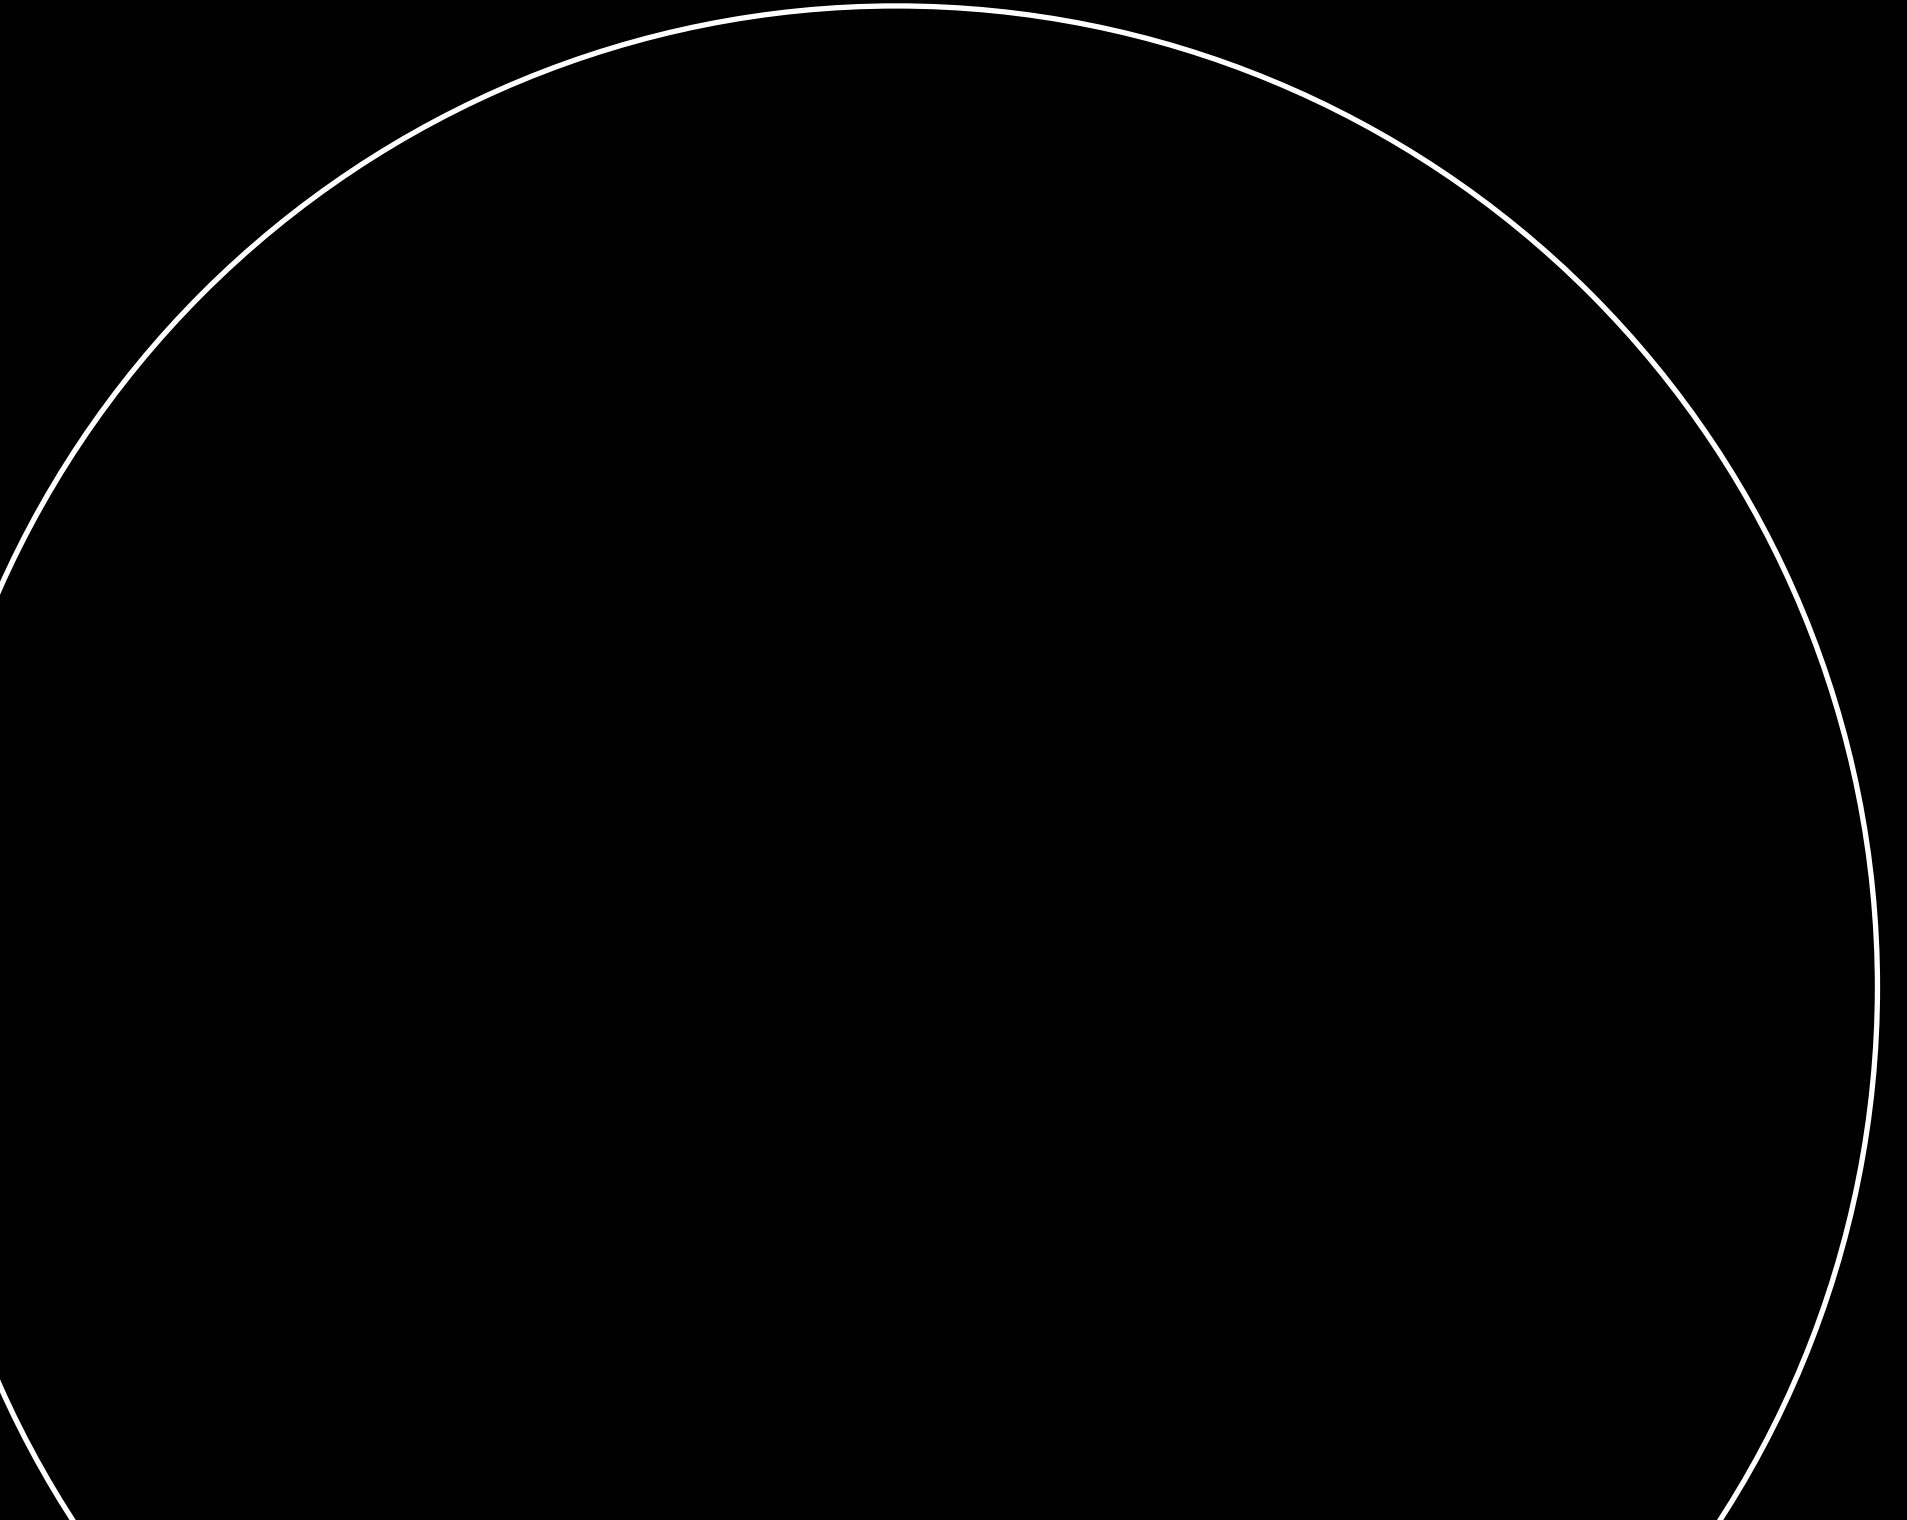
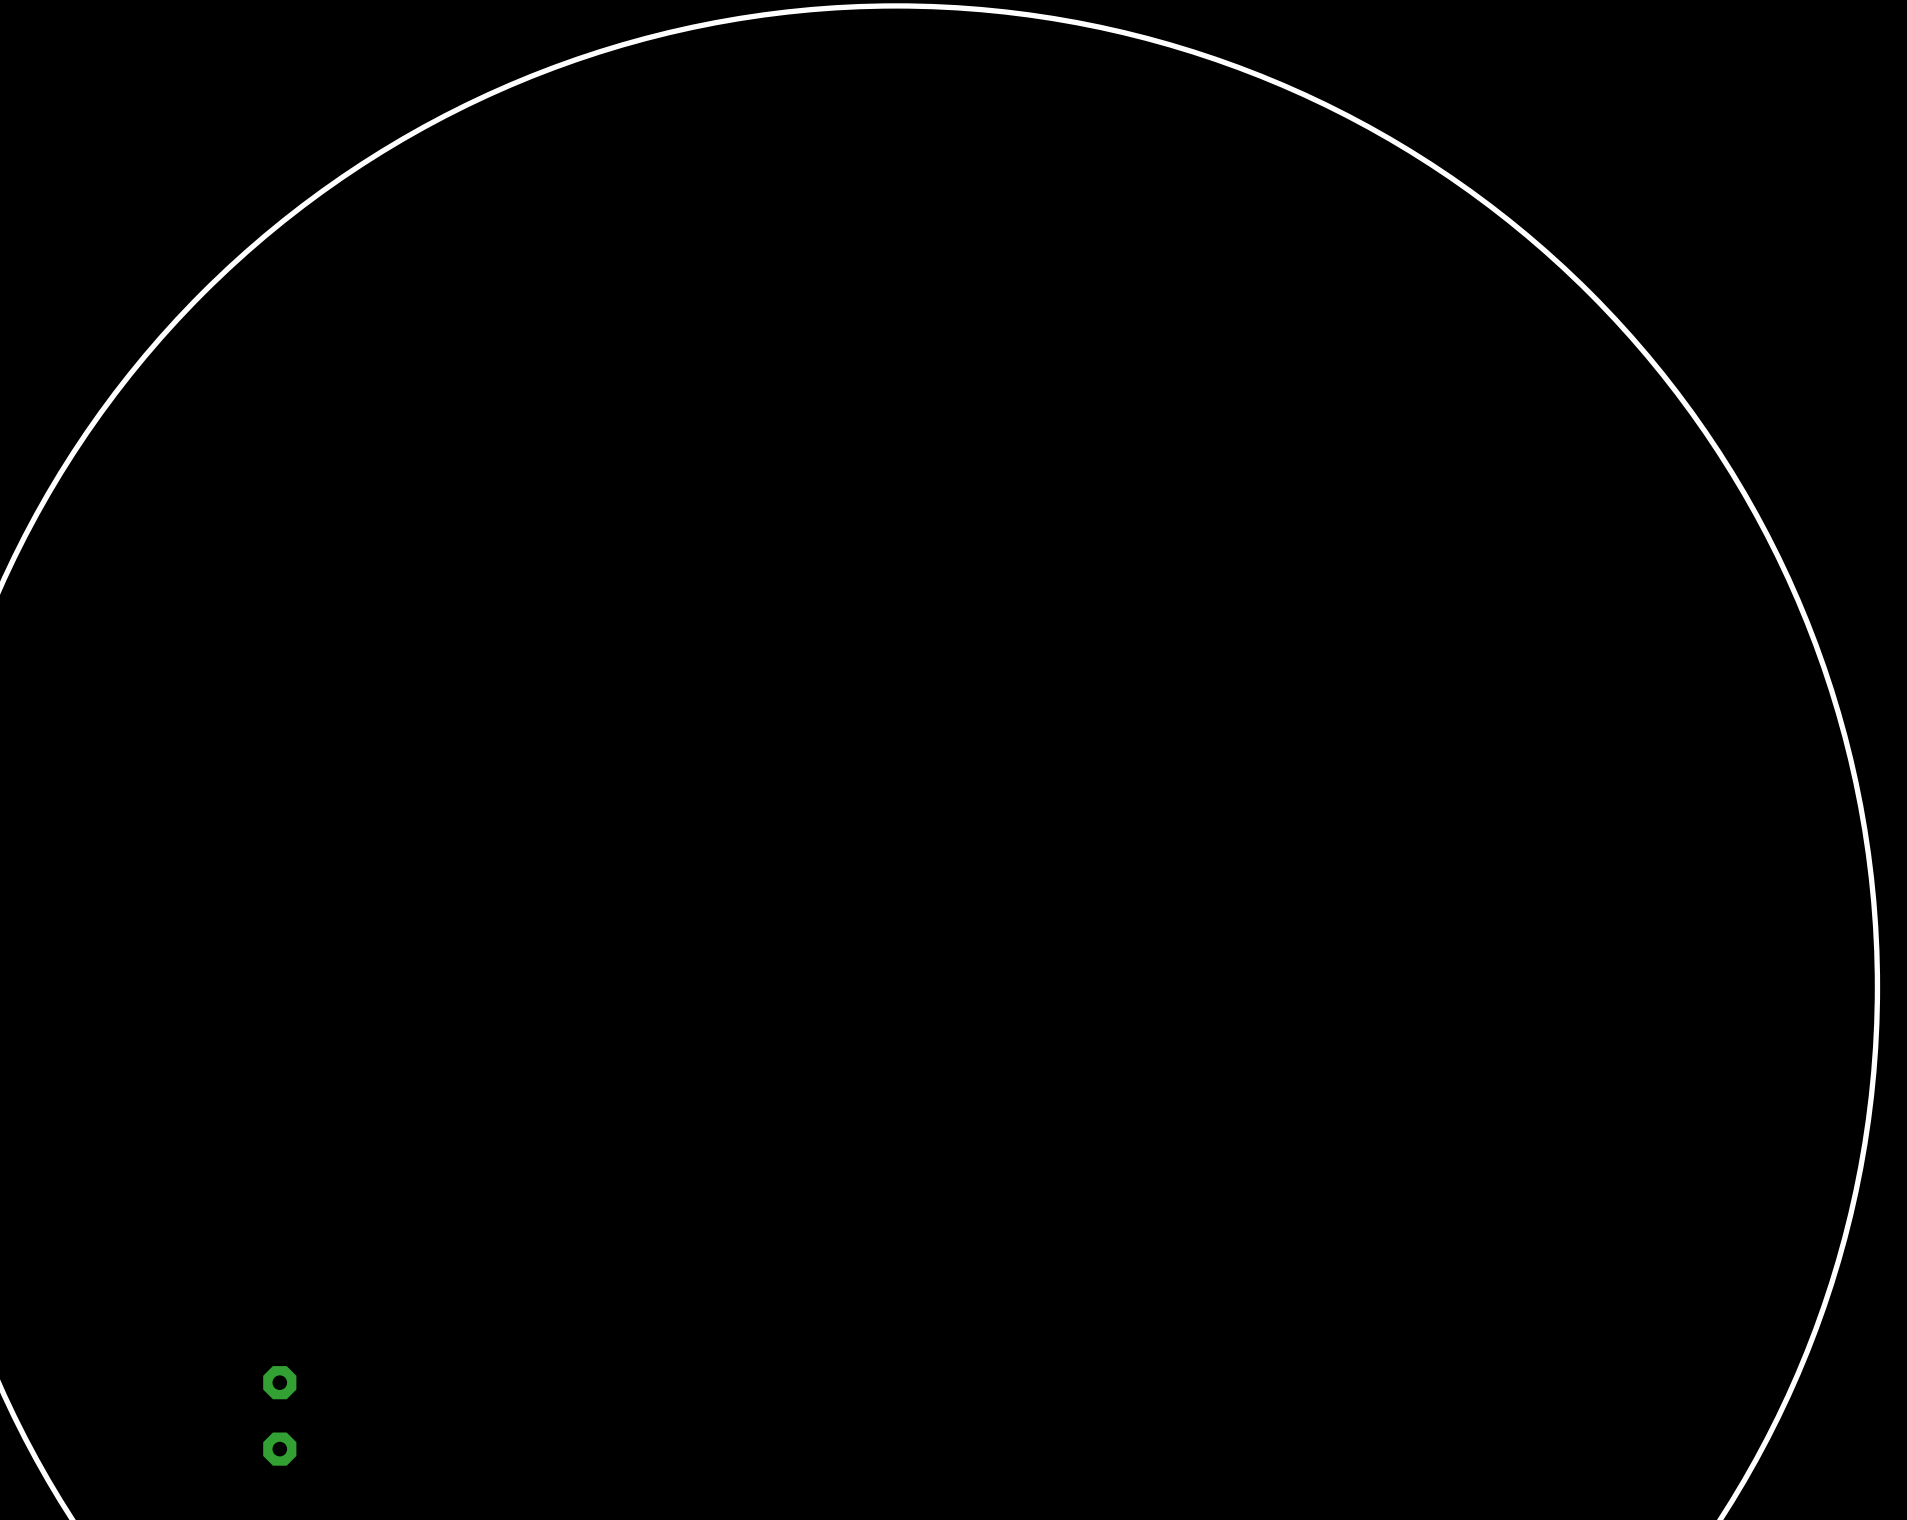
part: none -> (279, 1382)
part: none -> (279, 1449)

